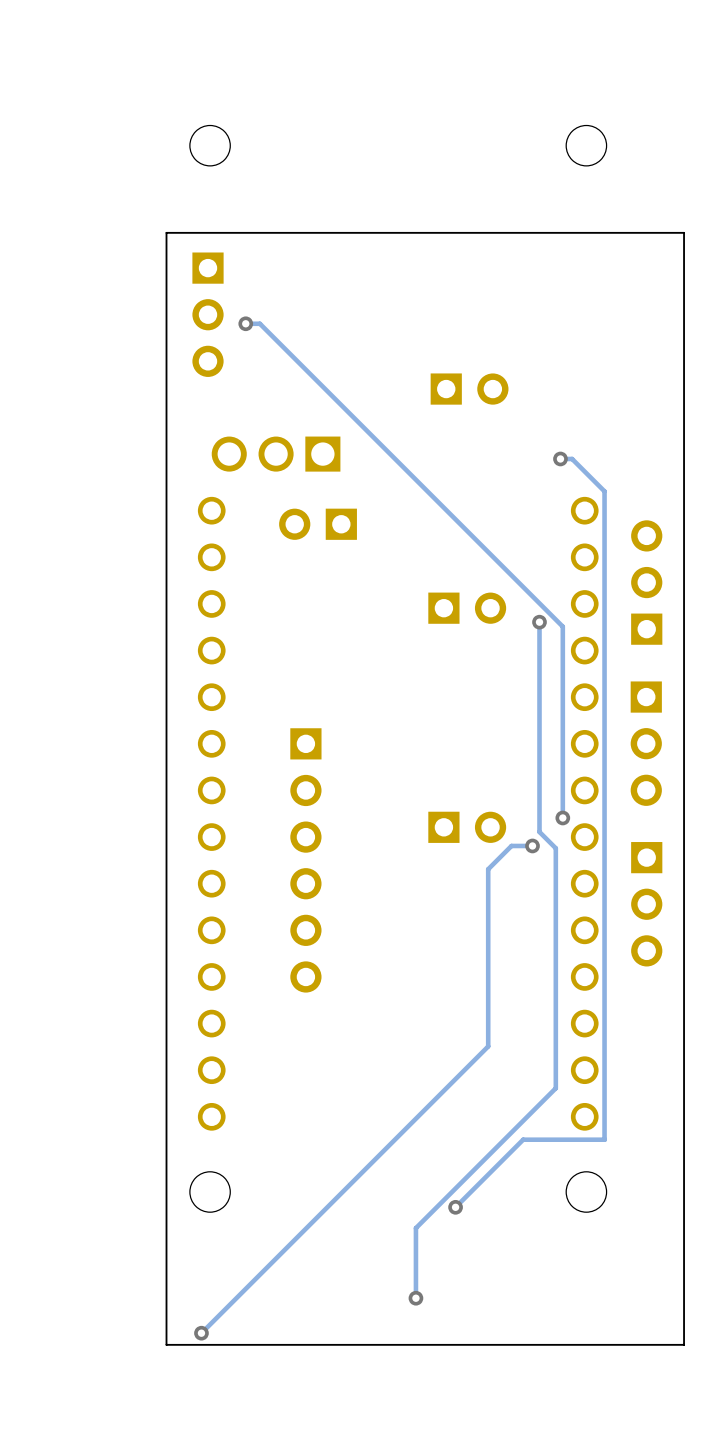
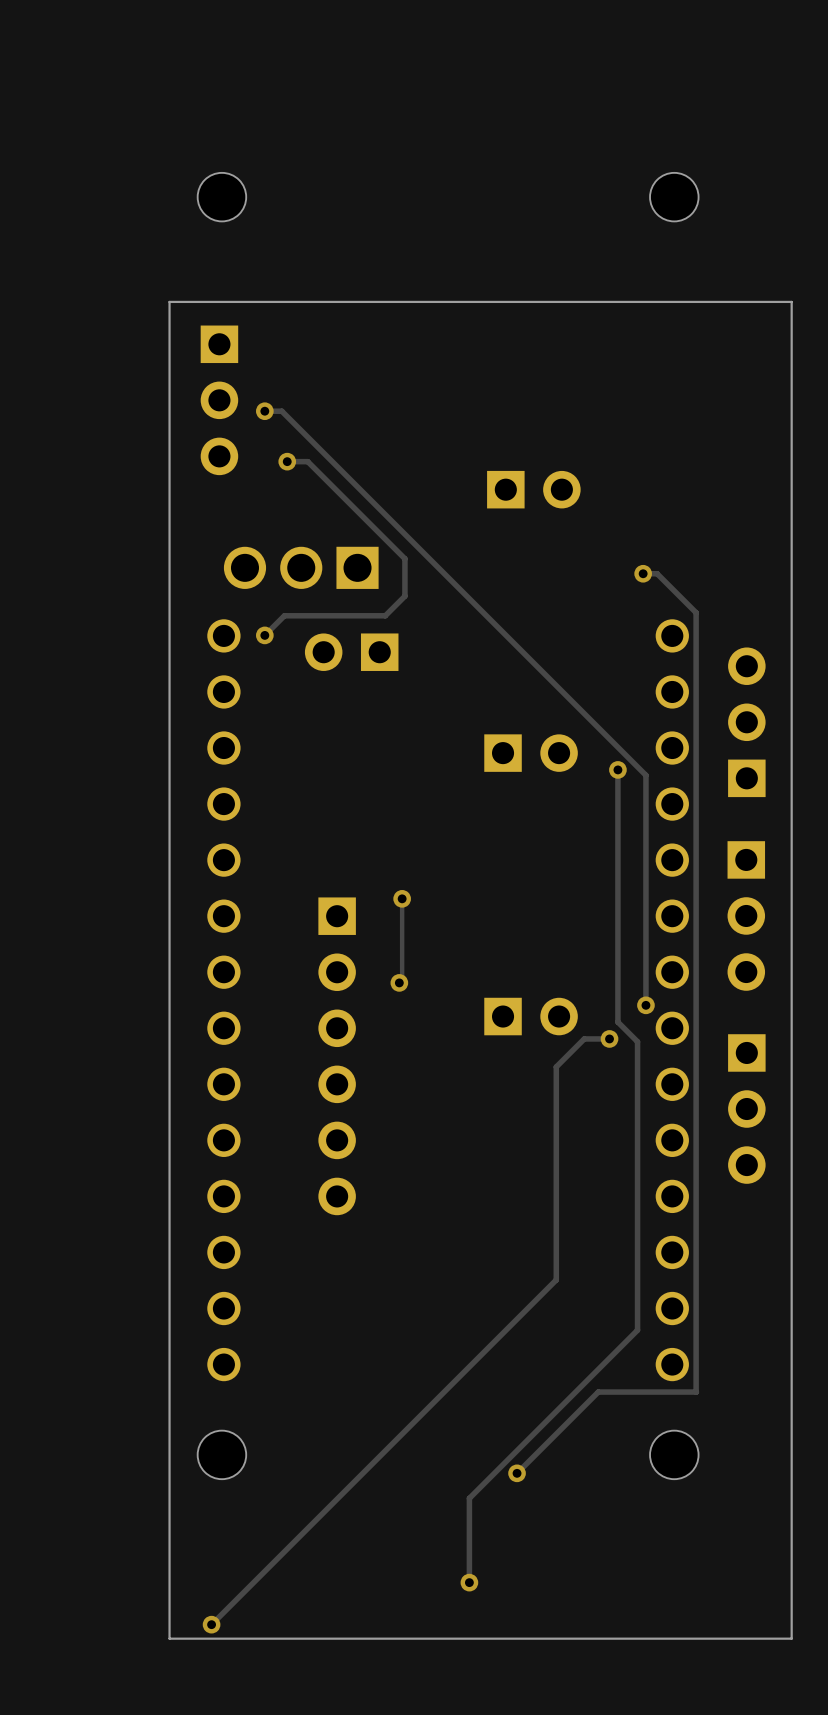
track: none -> (287, 461) (307, 461) (404, 558) (404, 596) (385, 615) (284, 615) (264, 635)
via: none -> (287, 461)
via: none -> (264, 635)
track: none -> (402, 898) (402, 980) (399, 982)
via: none -> (402, 898)
via: none -> (399, 982)

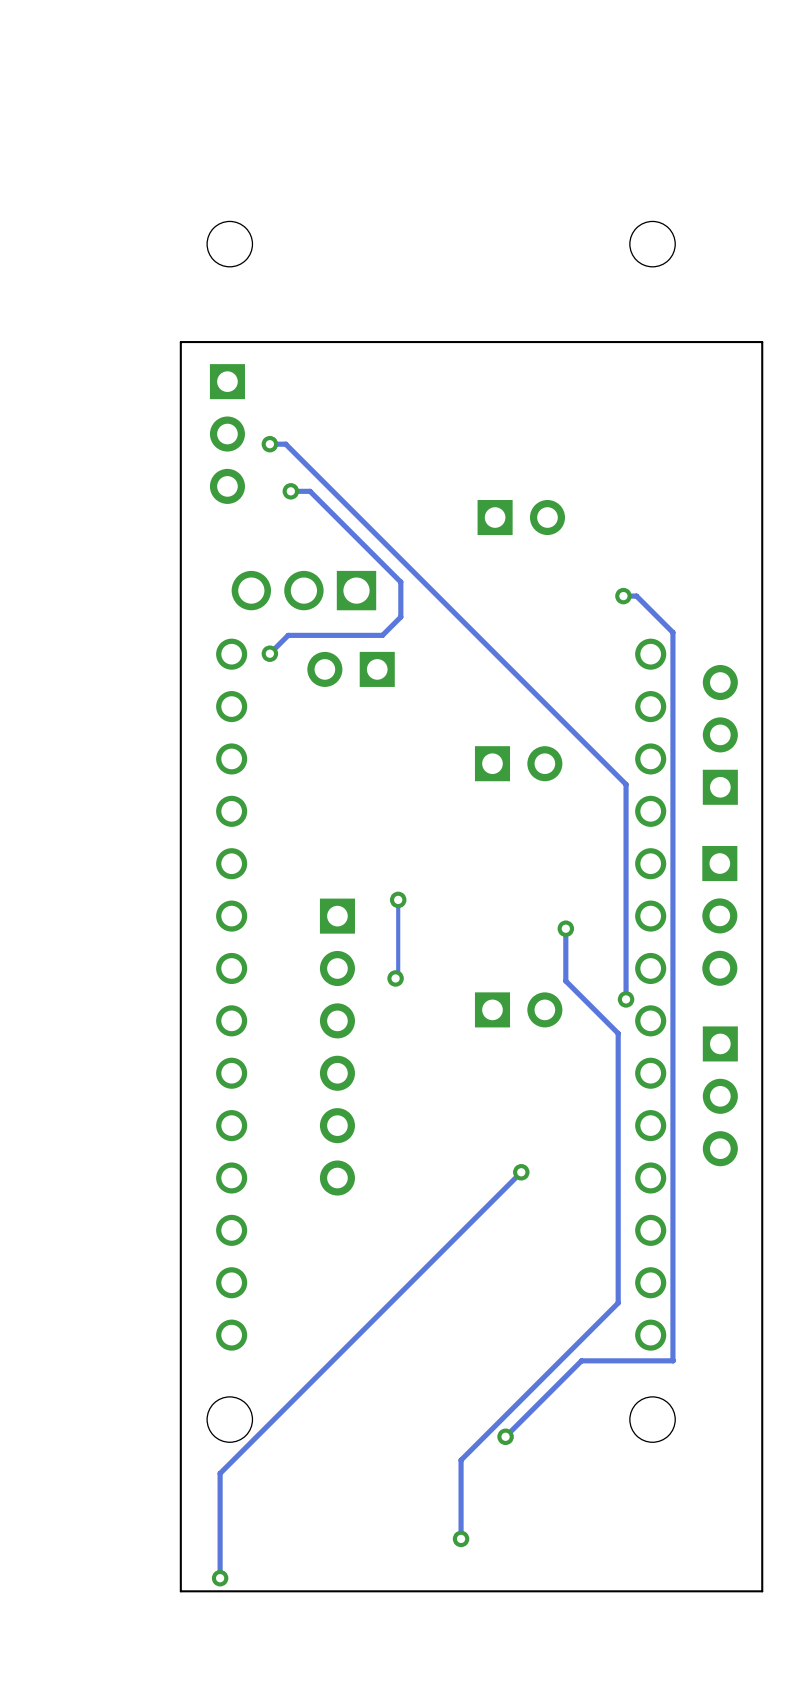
track: (617, 769) (617, 1022) -> (565, 928) (565, 981) (599, 1015)
via: (617, 769) -> none
via: none -> (565, 928)
track: (609, 1038) (584, 1038) (556, 1066) (556, 1279) (211, 1624) -> (521, 1172) (220, 1473) (220, 1578)
via: (609, 1038) -> none
via: none -> (521, 1172)

